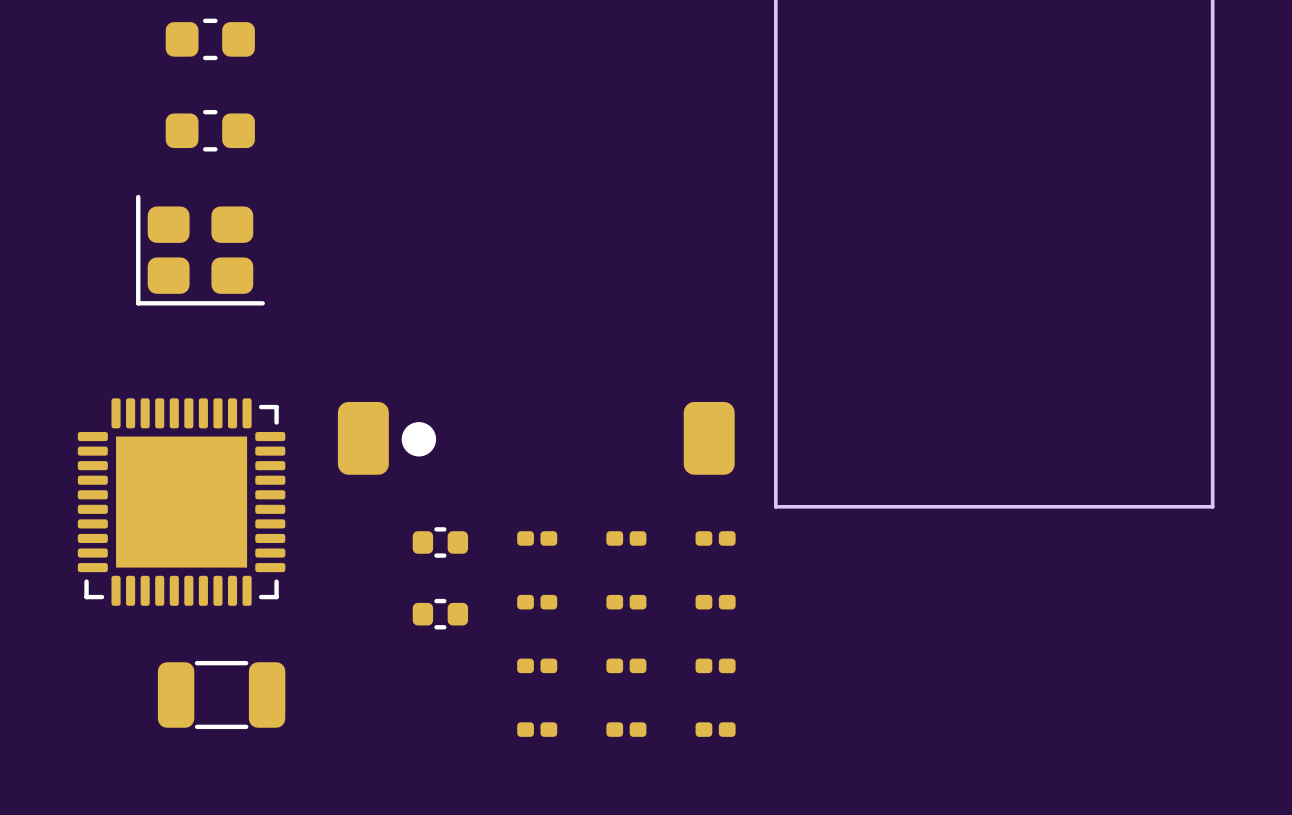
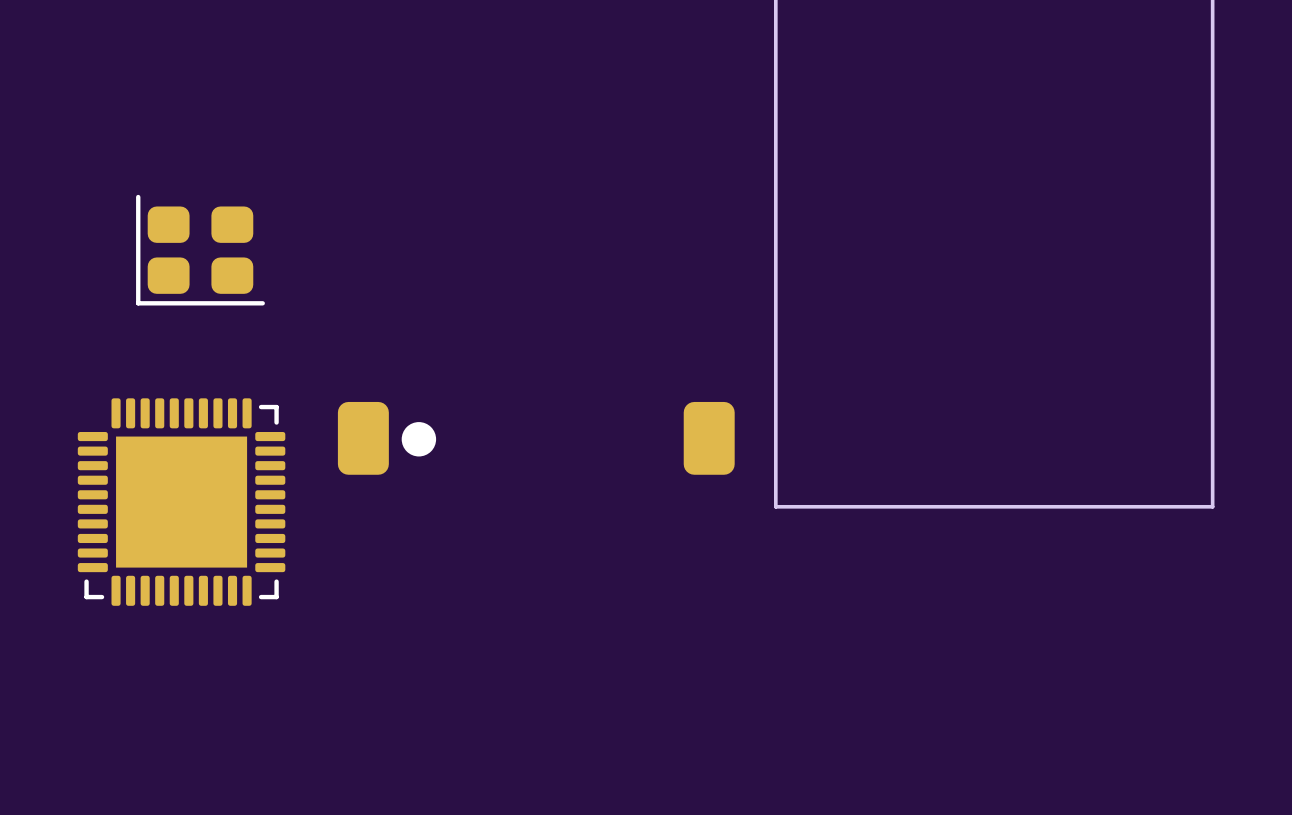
part: (210, 39) -> none
part: (210, 130) -> none
part: (537, 538) -> none
part: (626, 538) -> none
part: (715, 538) -> none
part: (440, 542) -> none
part: (537, 602) -> none
part: (626, 602) -> none
part: (715, 602) -> none
part: (440, 614) -> none
part: (537, 665) -> none
part: (626, 665) -> none
part: (715, 665) -> none
part: (221, 695) -> none
part: (537, 729) -> none
part: (626, 729) -> none
part: (715, 729) -> none

